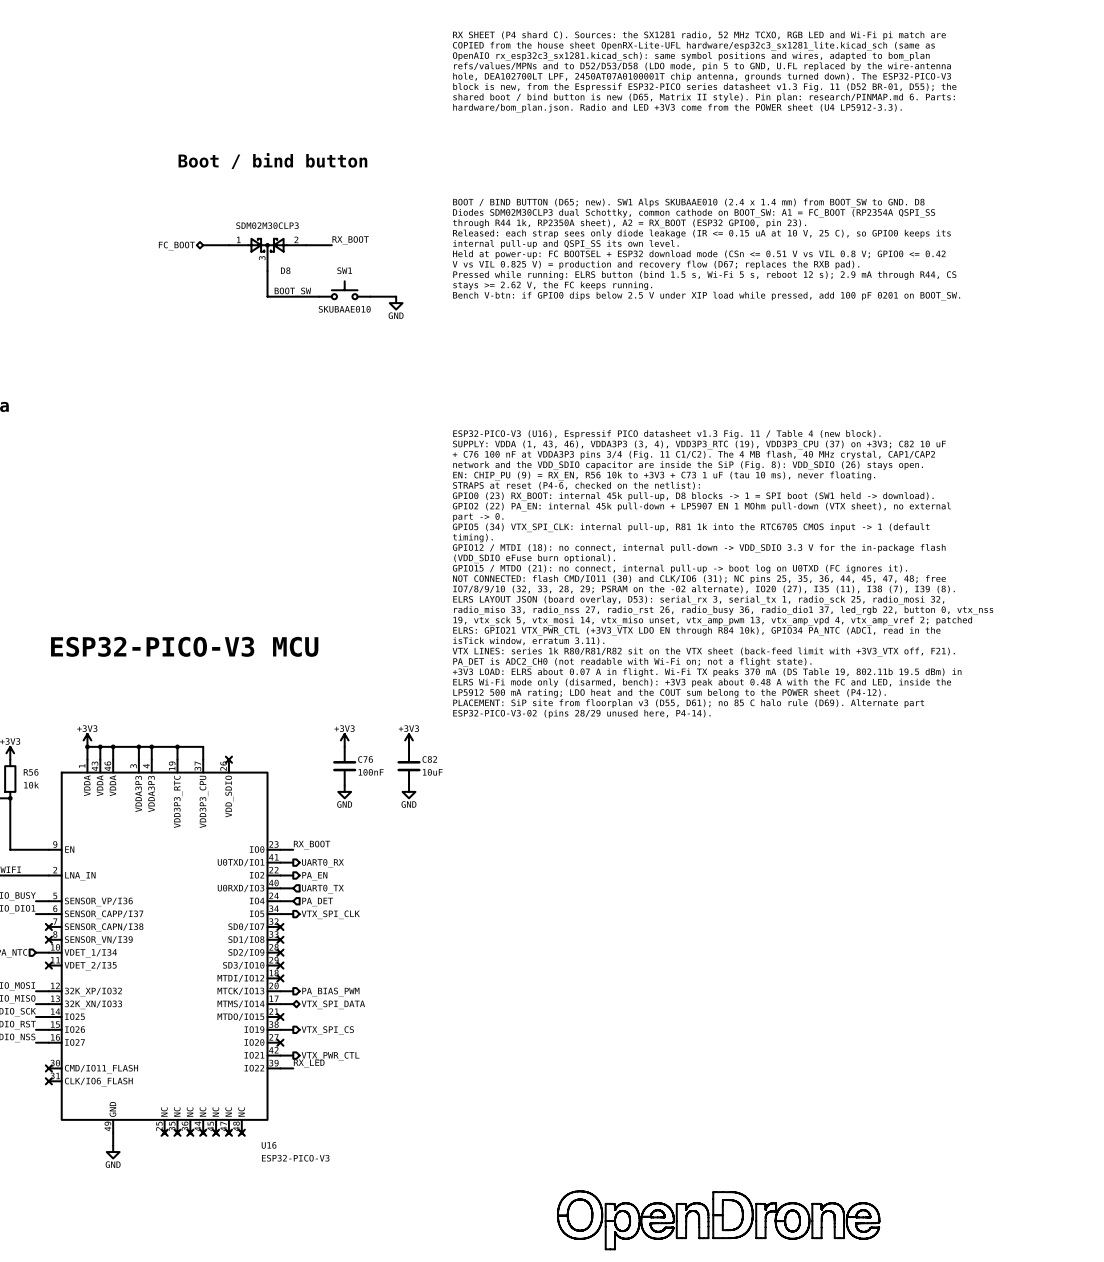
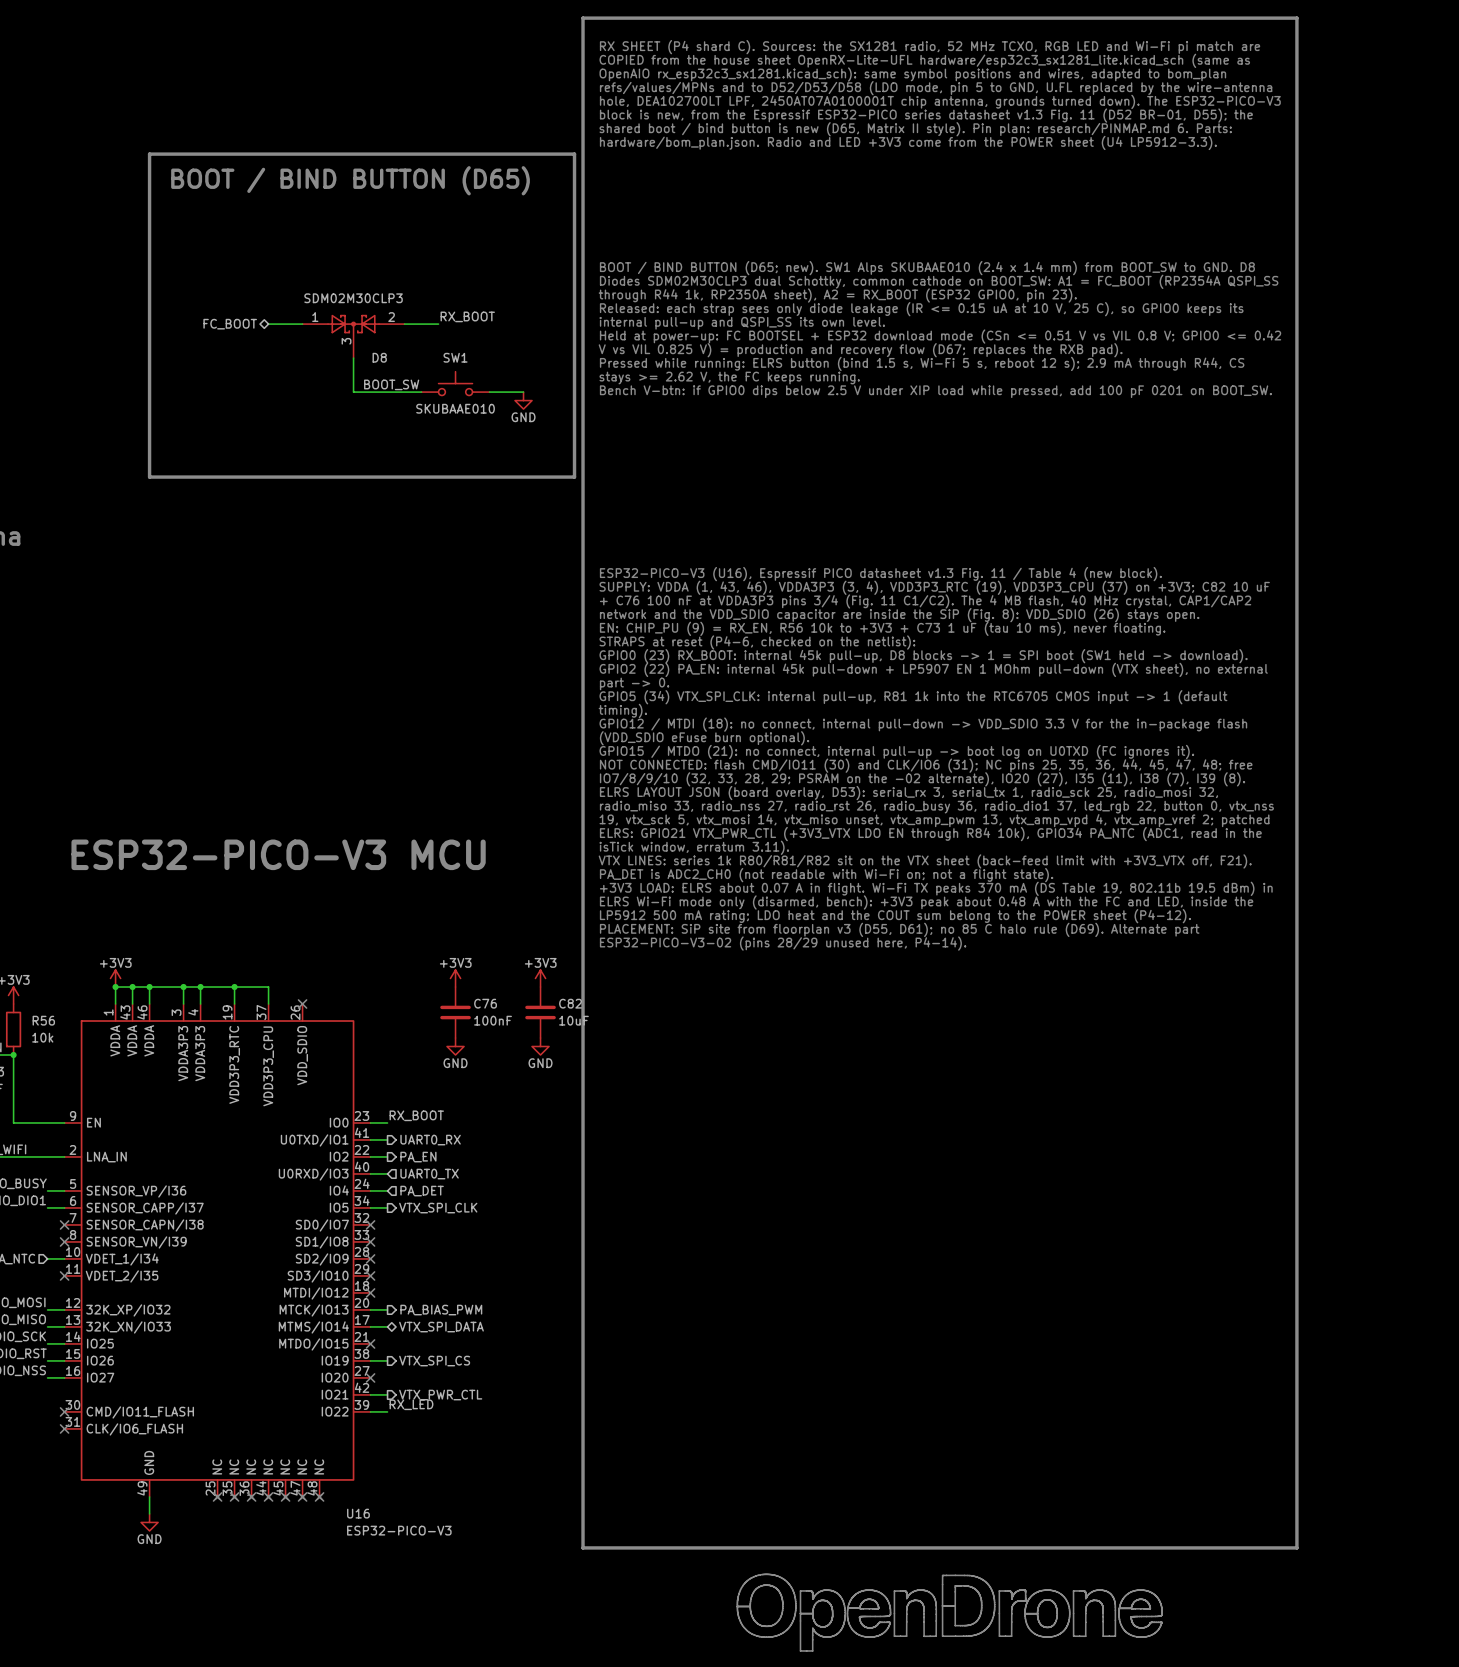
line: none -> (583, 18) (1296, 18) (1296, 1547) (583, 1547) (583, 18)
line: none -> (149, 154) (574, 154) (574, 477) (149, 477) (149, 154)
text: none -> BOOT / BIND BUTTON (D65) (350, 180)
text: Boot / bind button (272, 161) -> none

